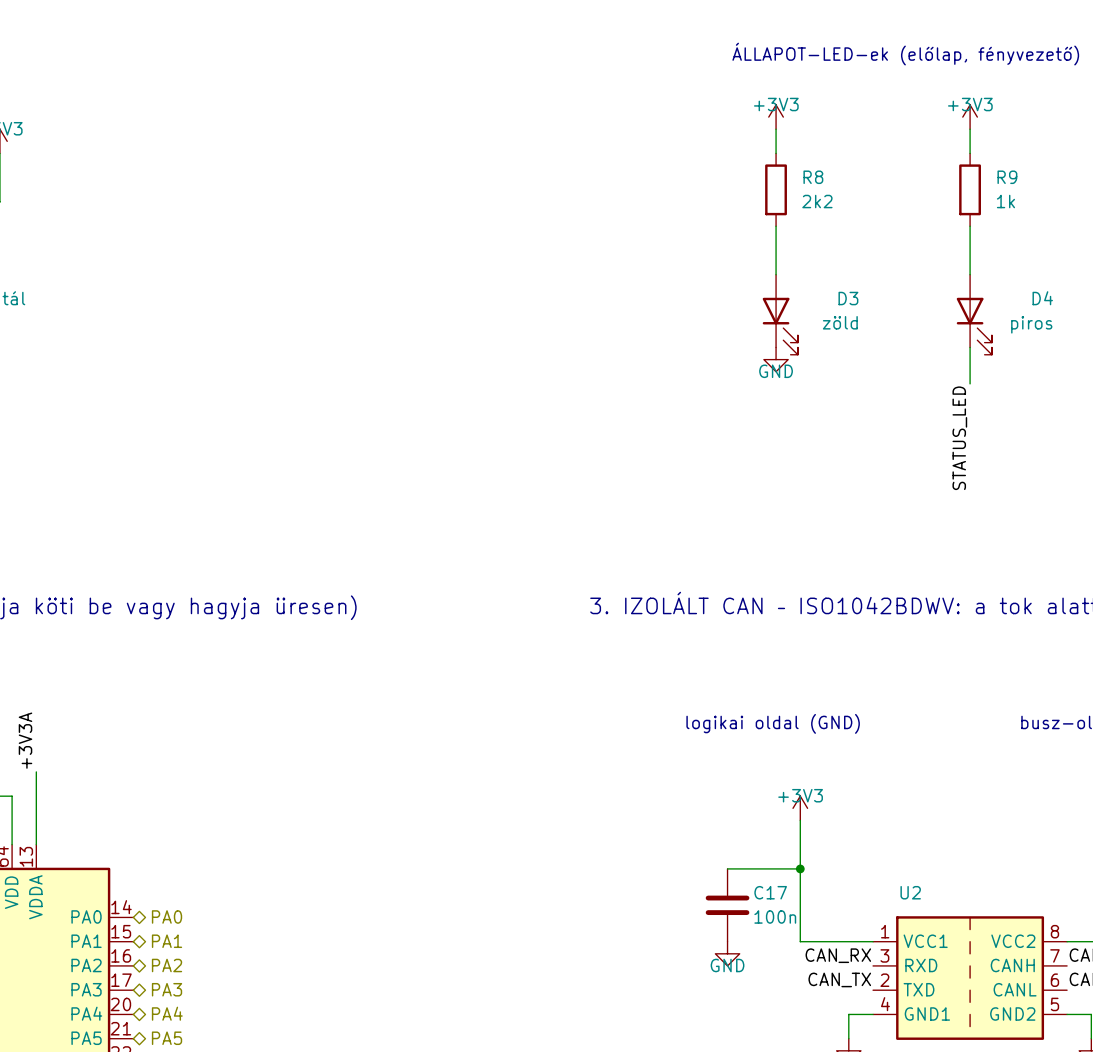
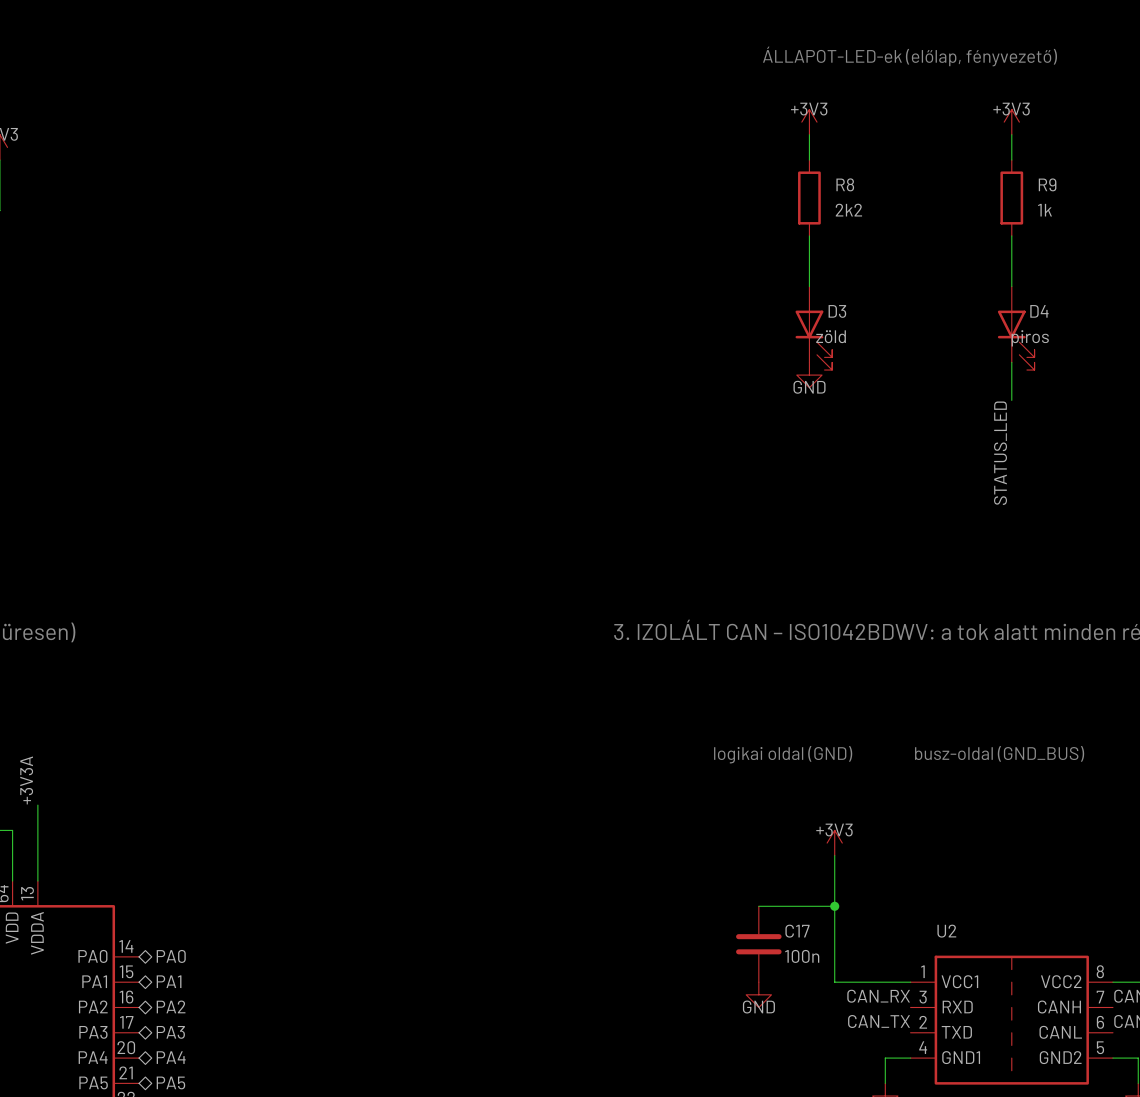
D3 name position: D3 (848, 298) -> D3 (837, 311)
D4 name position: D4 (1042, 298) -> D4 (1039, 311)
D3 value position: zöld (840, 322) -> zöld (831, 336)
D4 value position: piros (1031, 324) -> piros (1030, 338)

